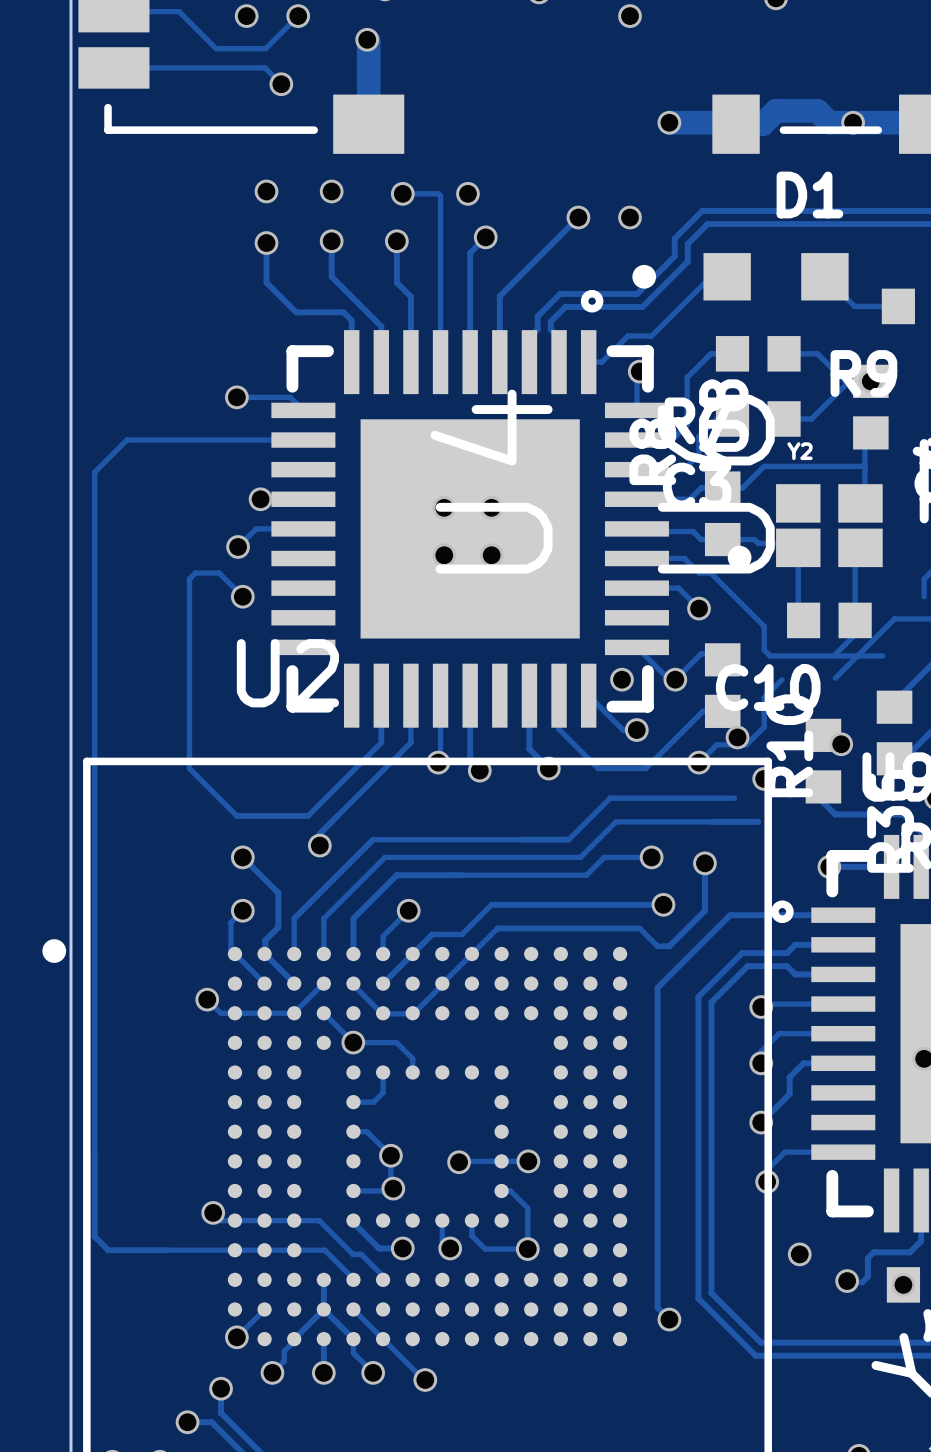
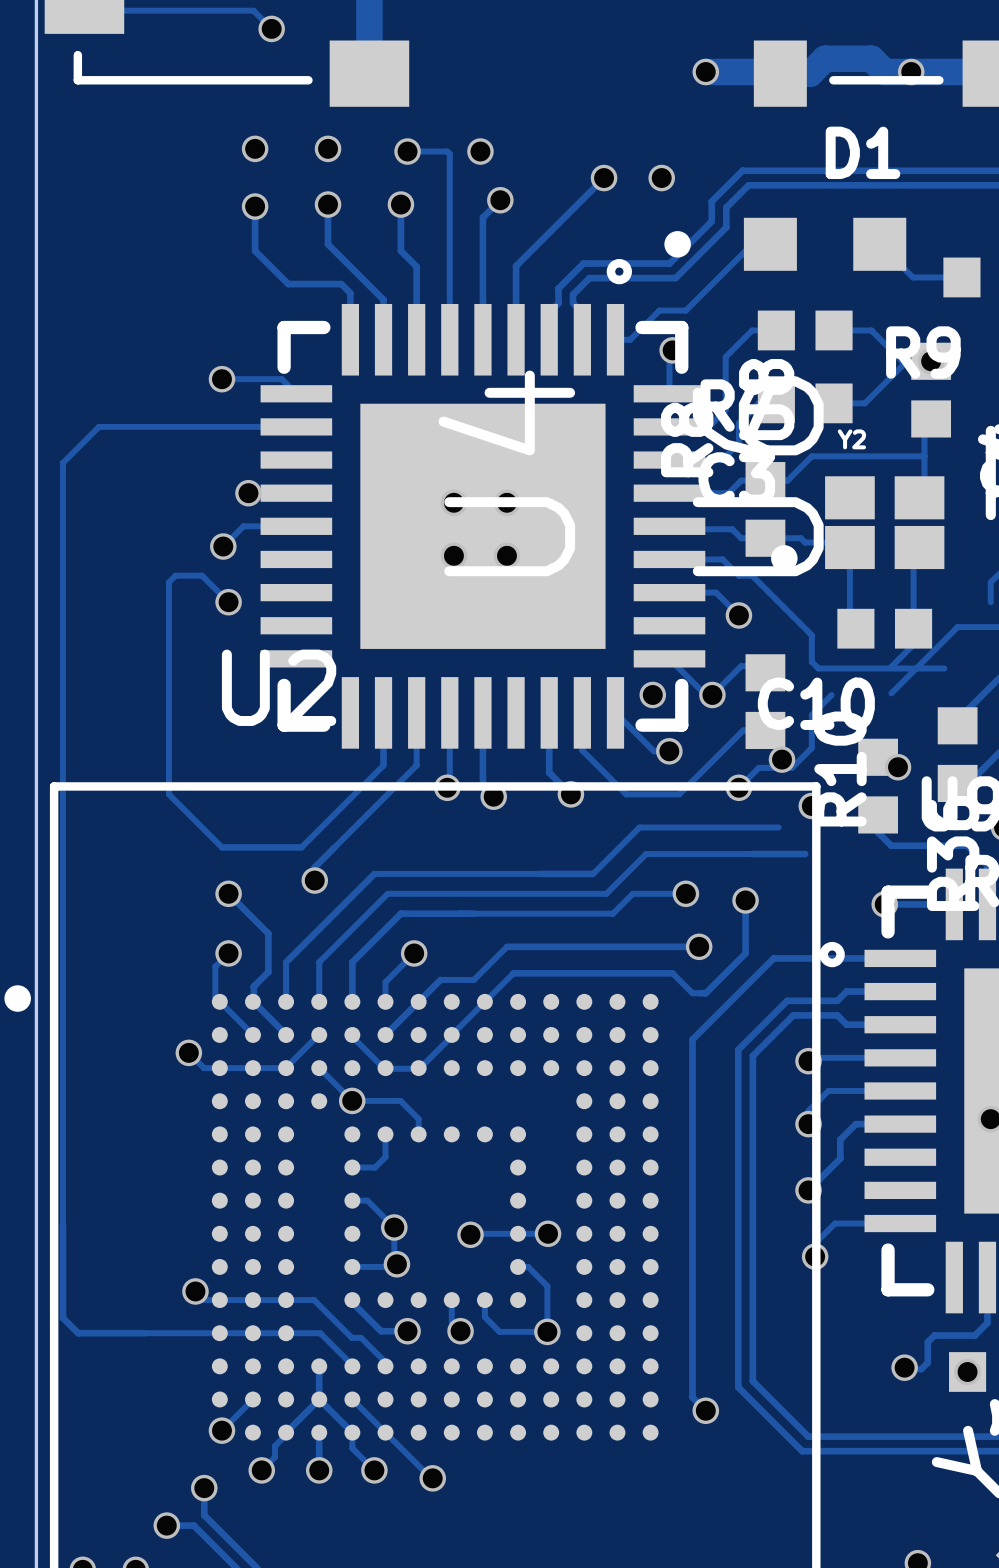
via: (799, 1254) -> none

